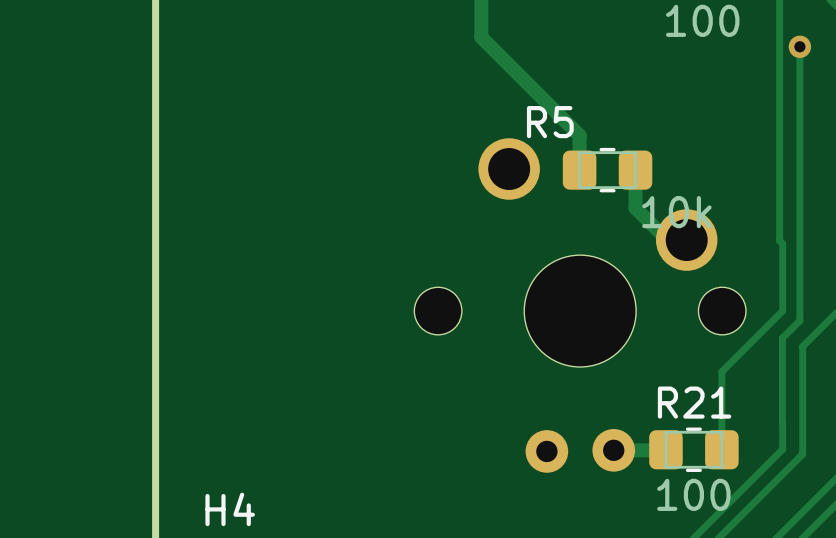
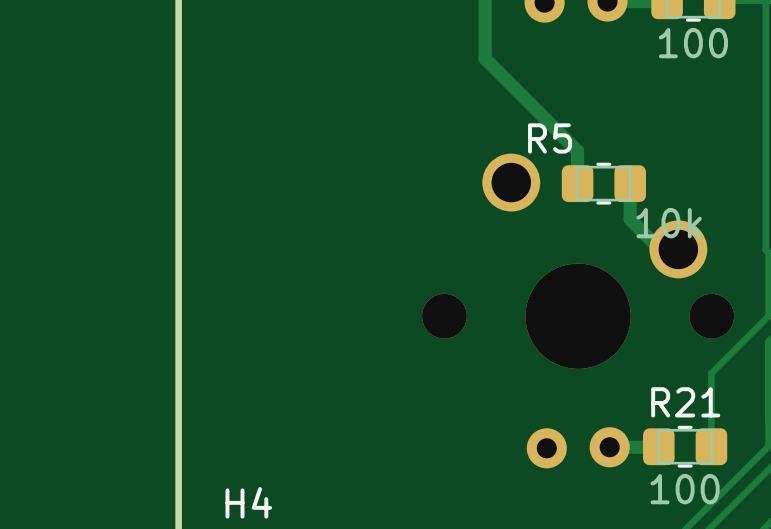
part footprint: [414, 138, 747, 473] -> [422, 153, 735, 469]

